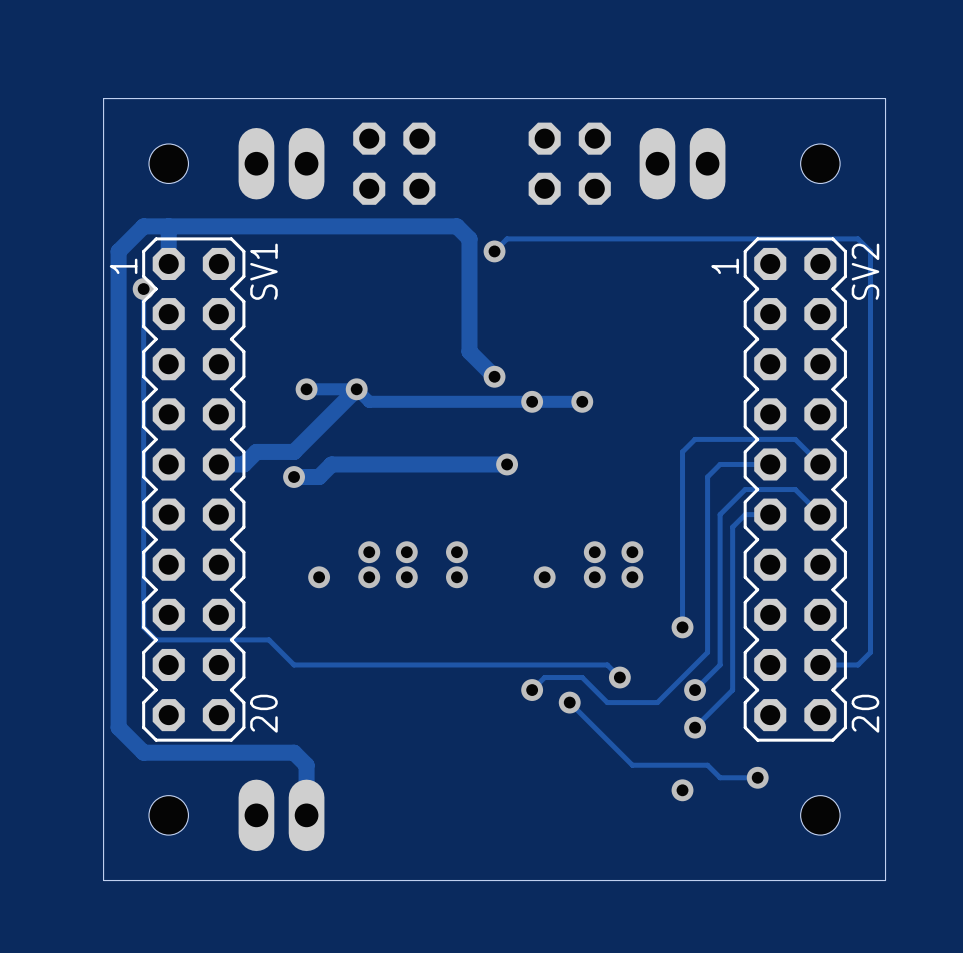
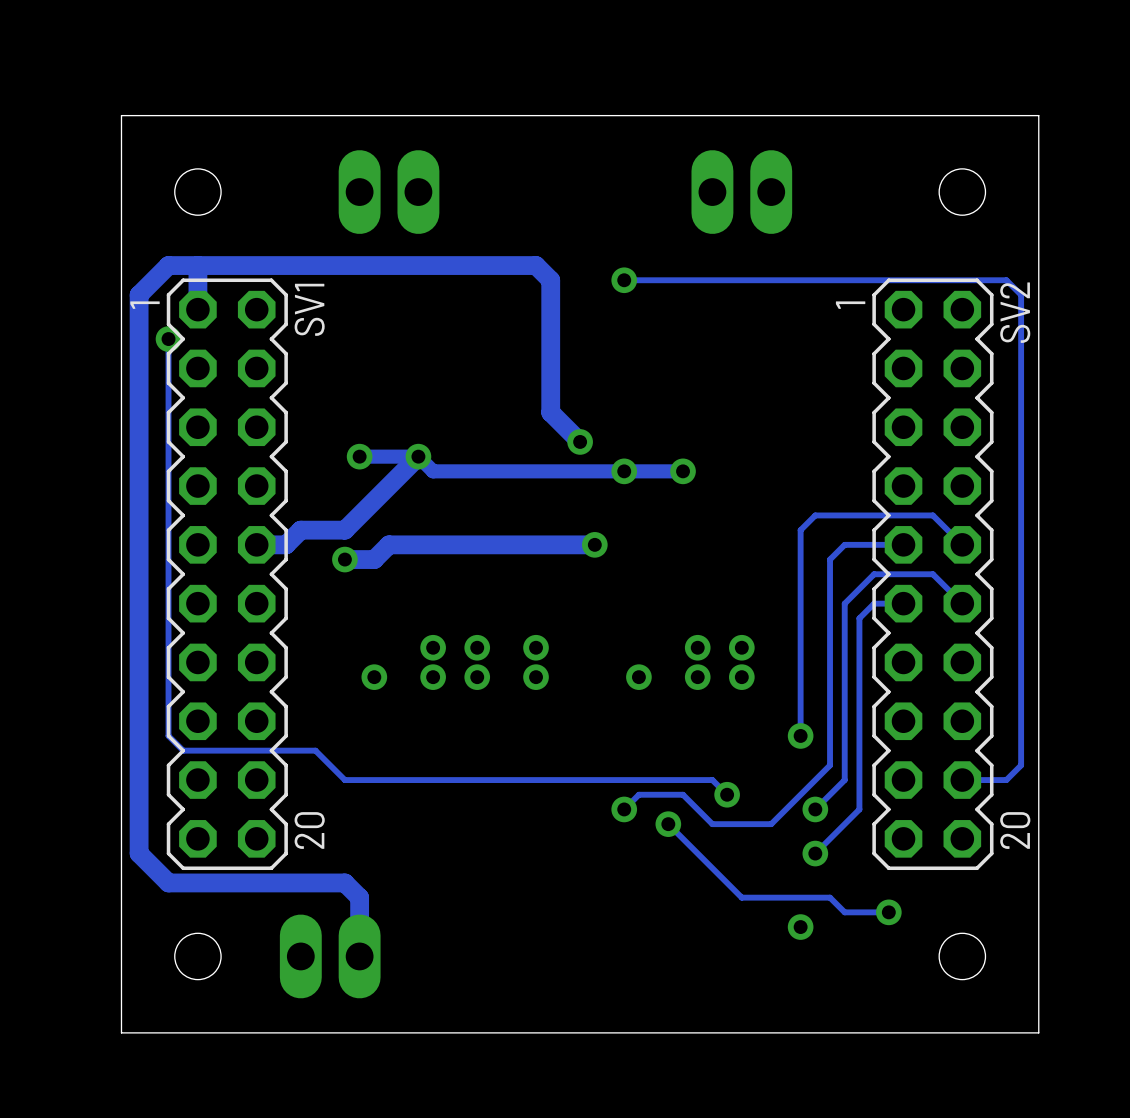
part position: (281, 163) -> (389, 192)
part: (394, 163) -> none
part: (569, 163) -> none
part position: (682, 163) -> (741, 192)
track: (532, 238) (507, 238) (494, 251) -> none
via position: (494, 251) -> (624, 280)

